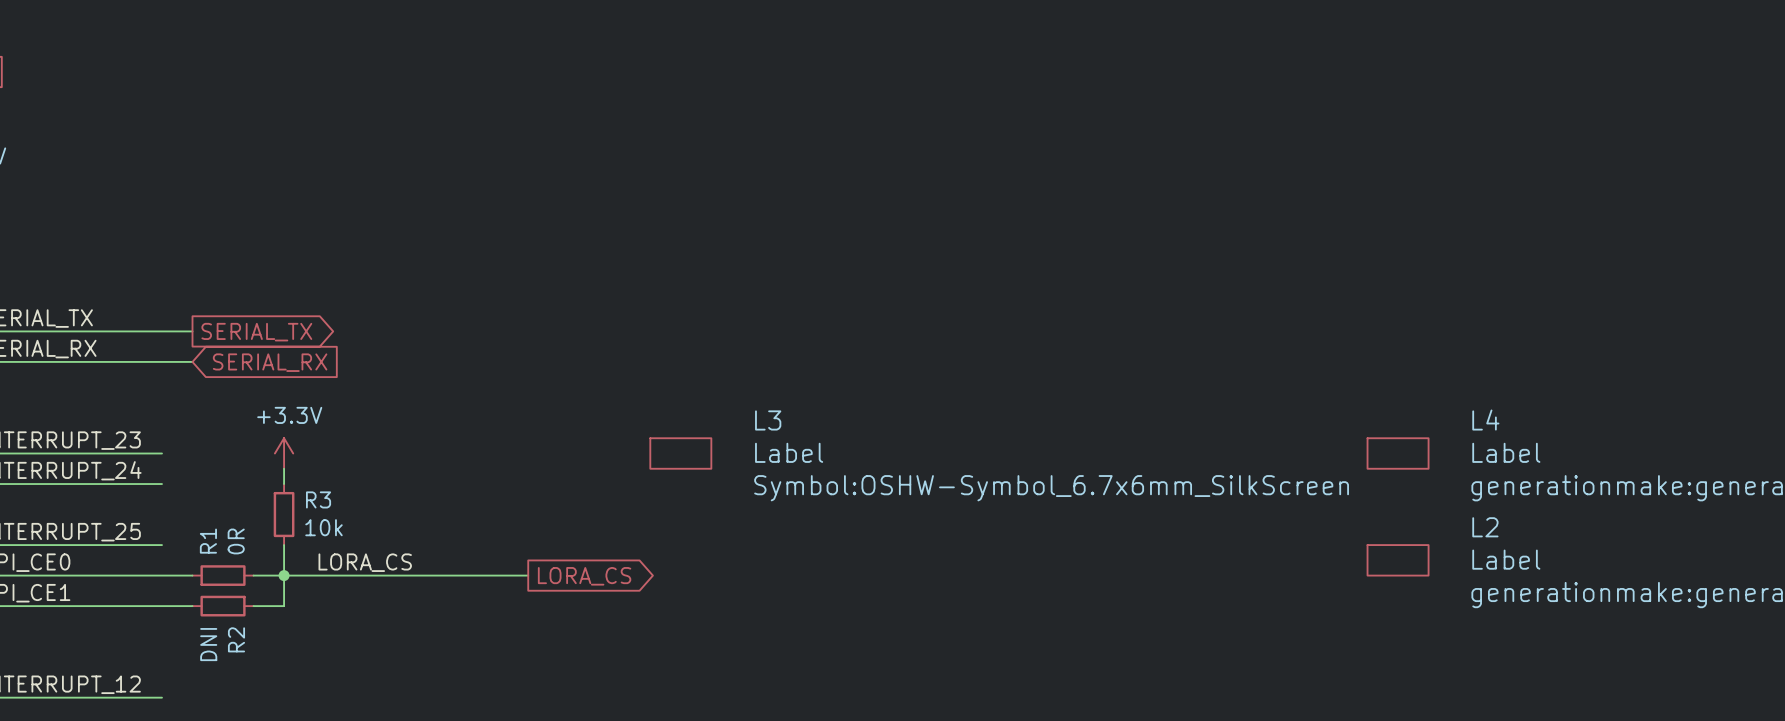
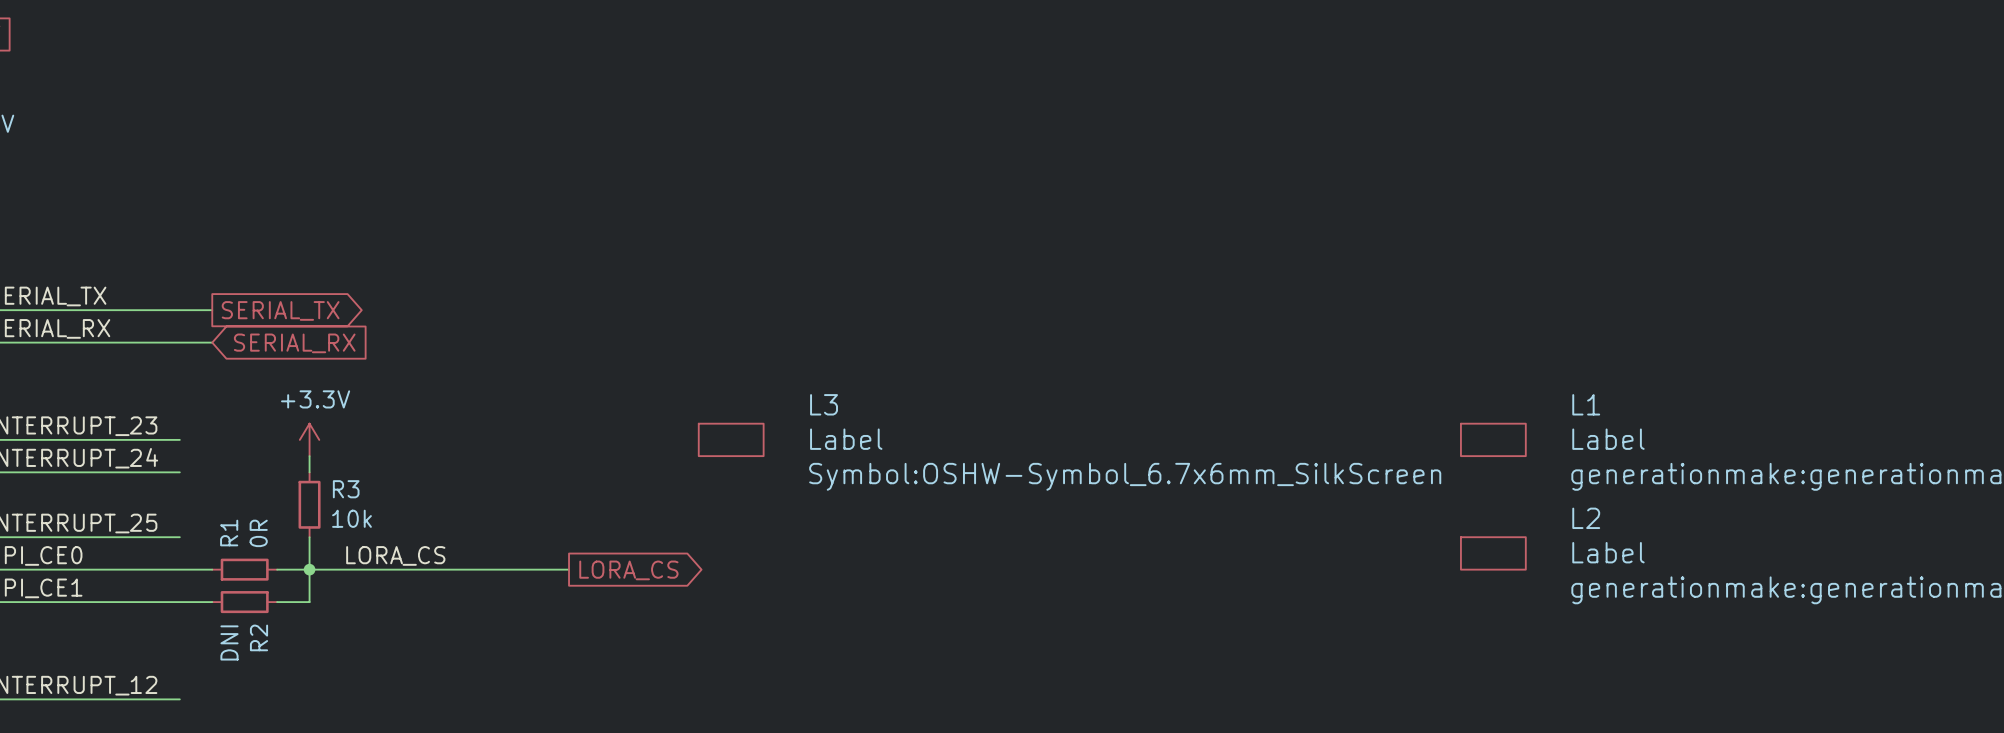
L4 name: L4 (1485, 420) -> L1 (1586, 404)

